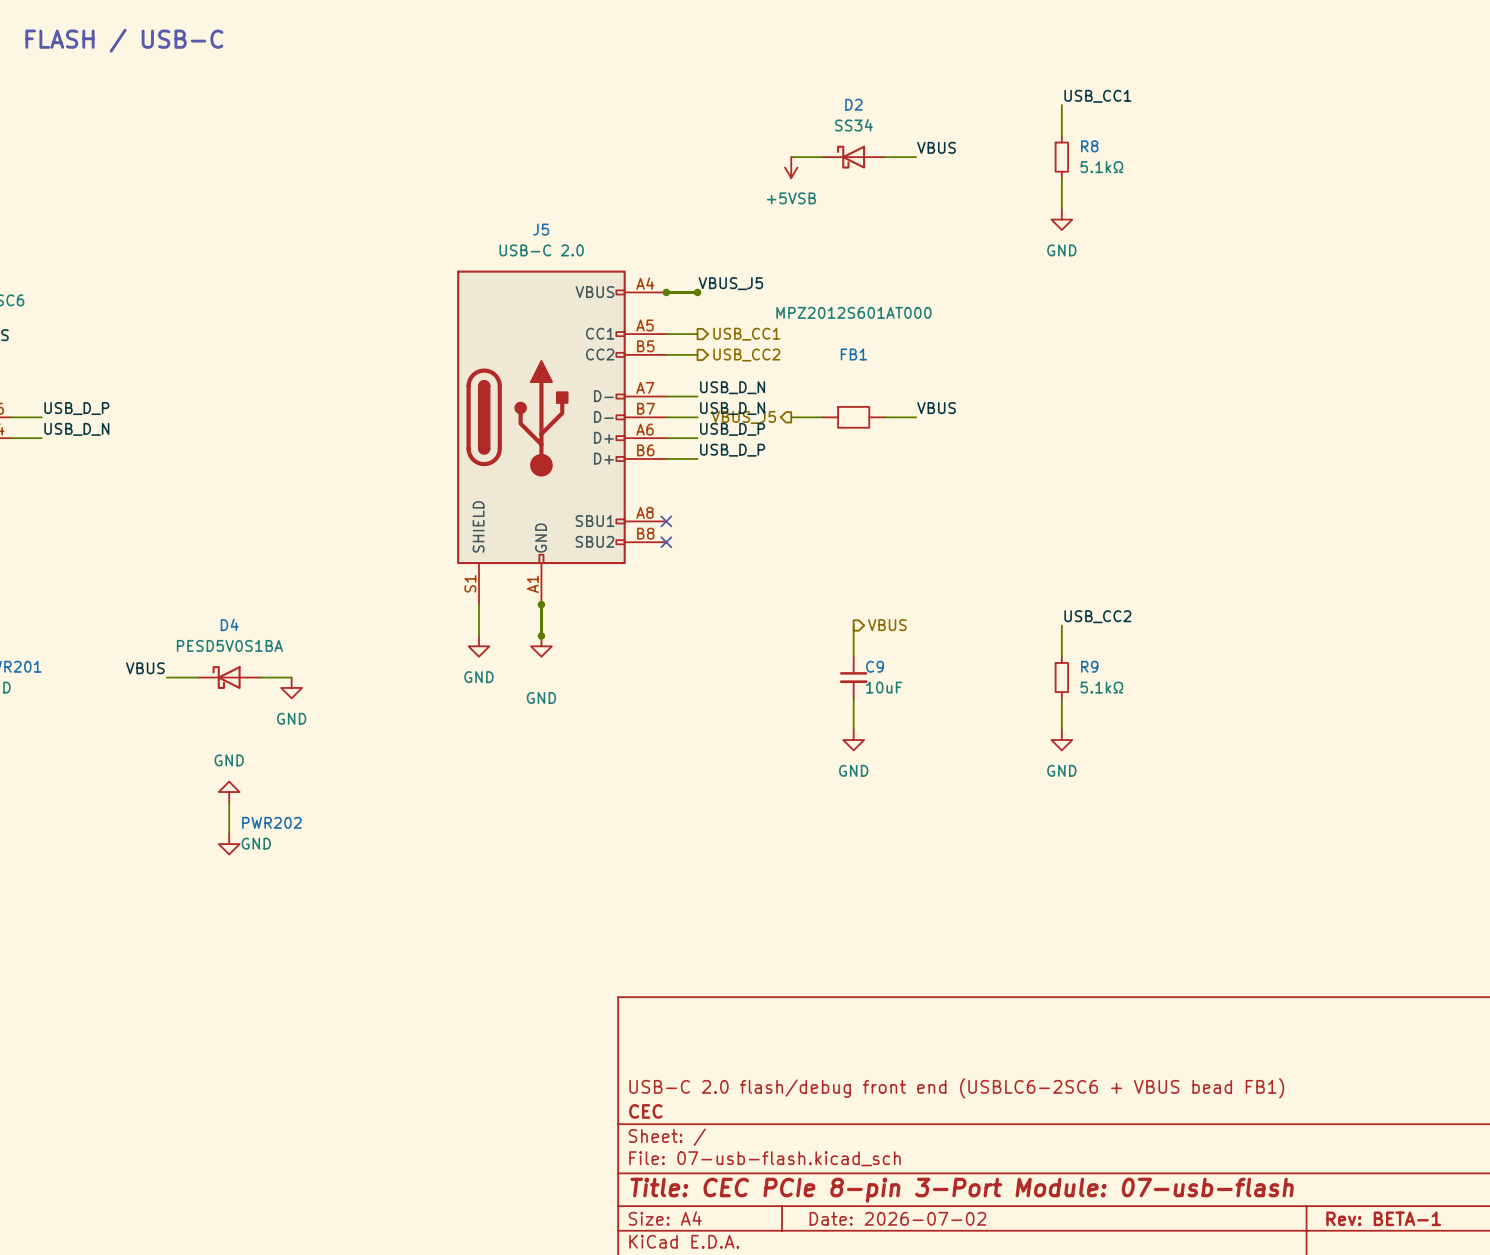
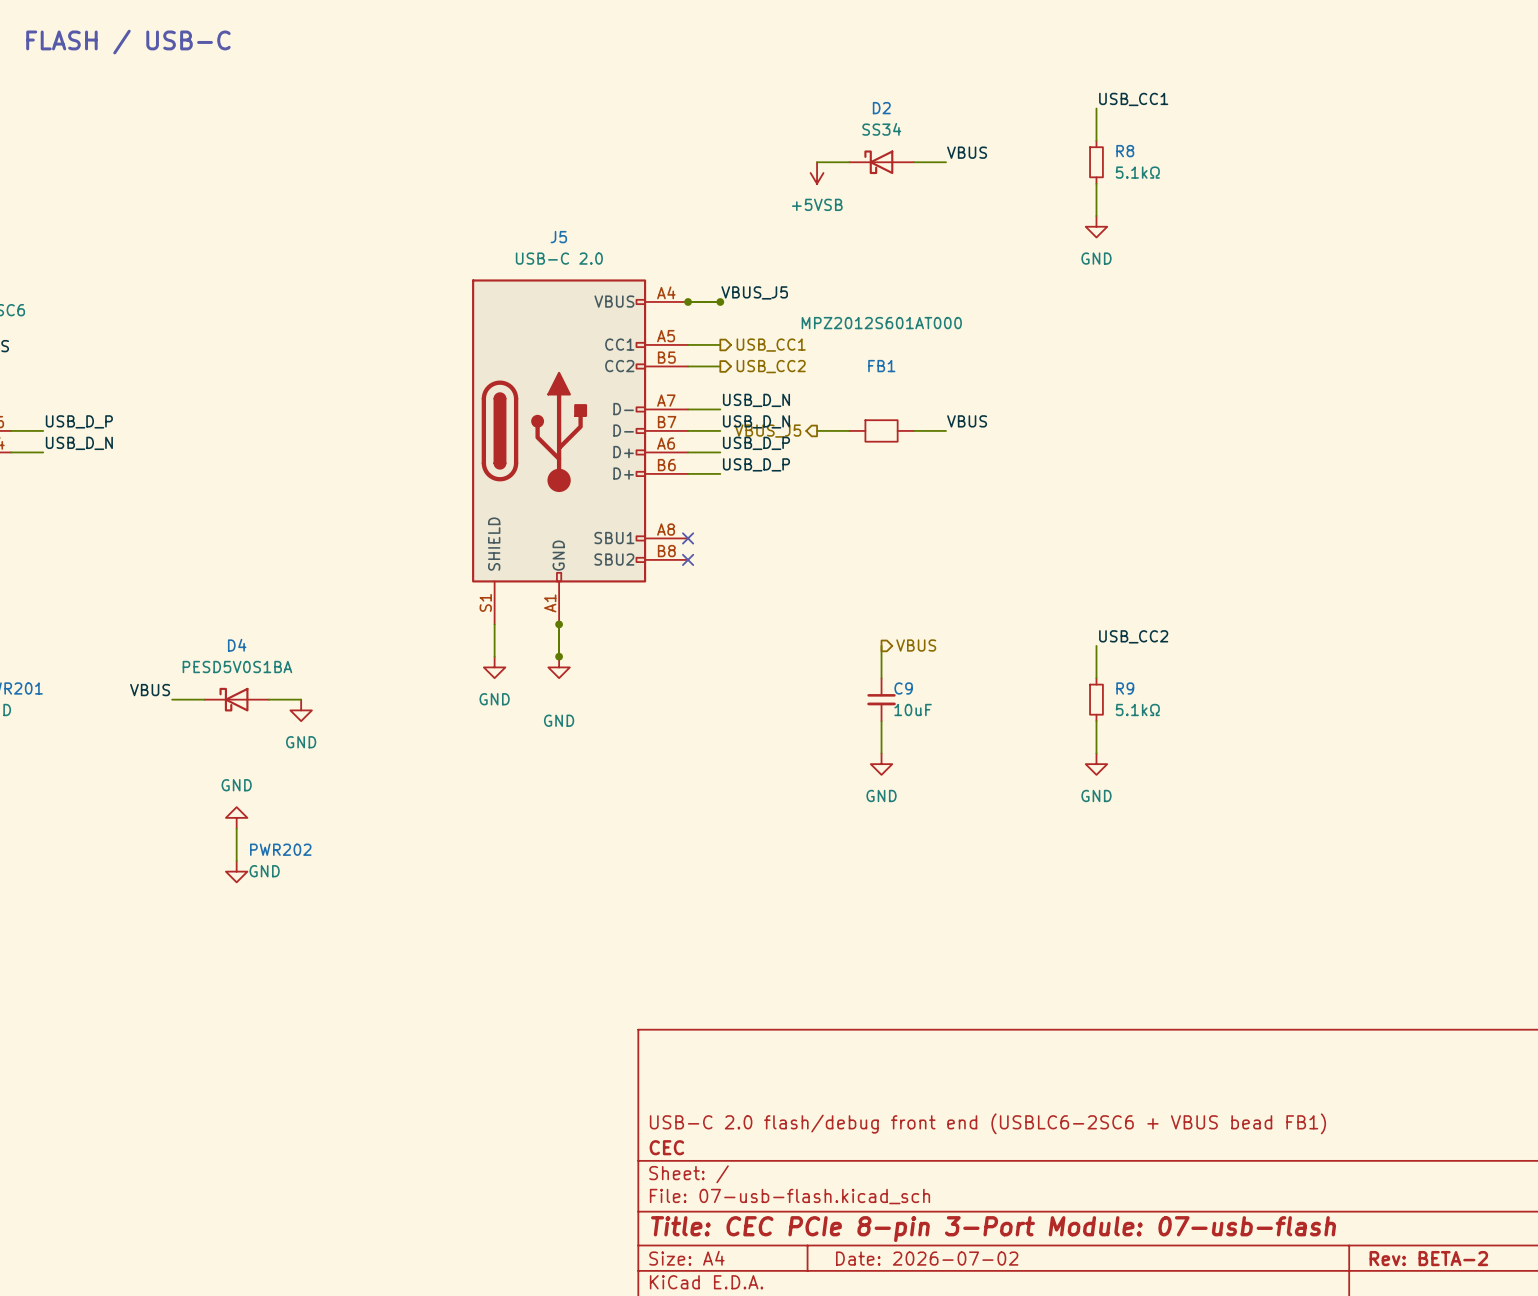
title block: Rev: BETA-1 (1383, 1218) -> Rev: BETA-2 (1428, 1258)

